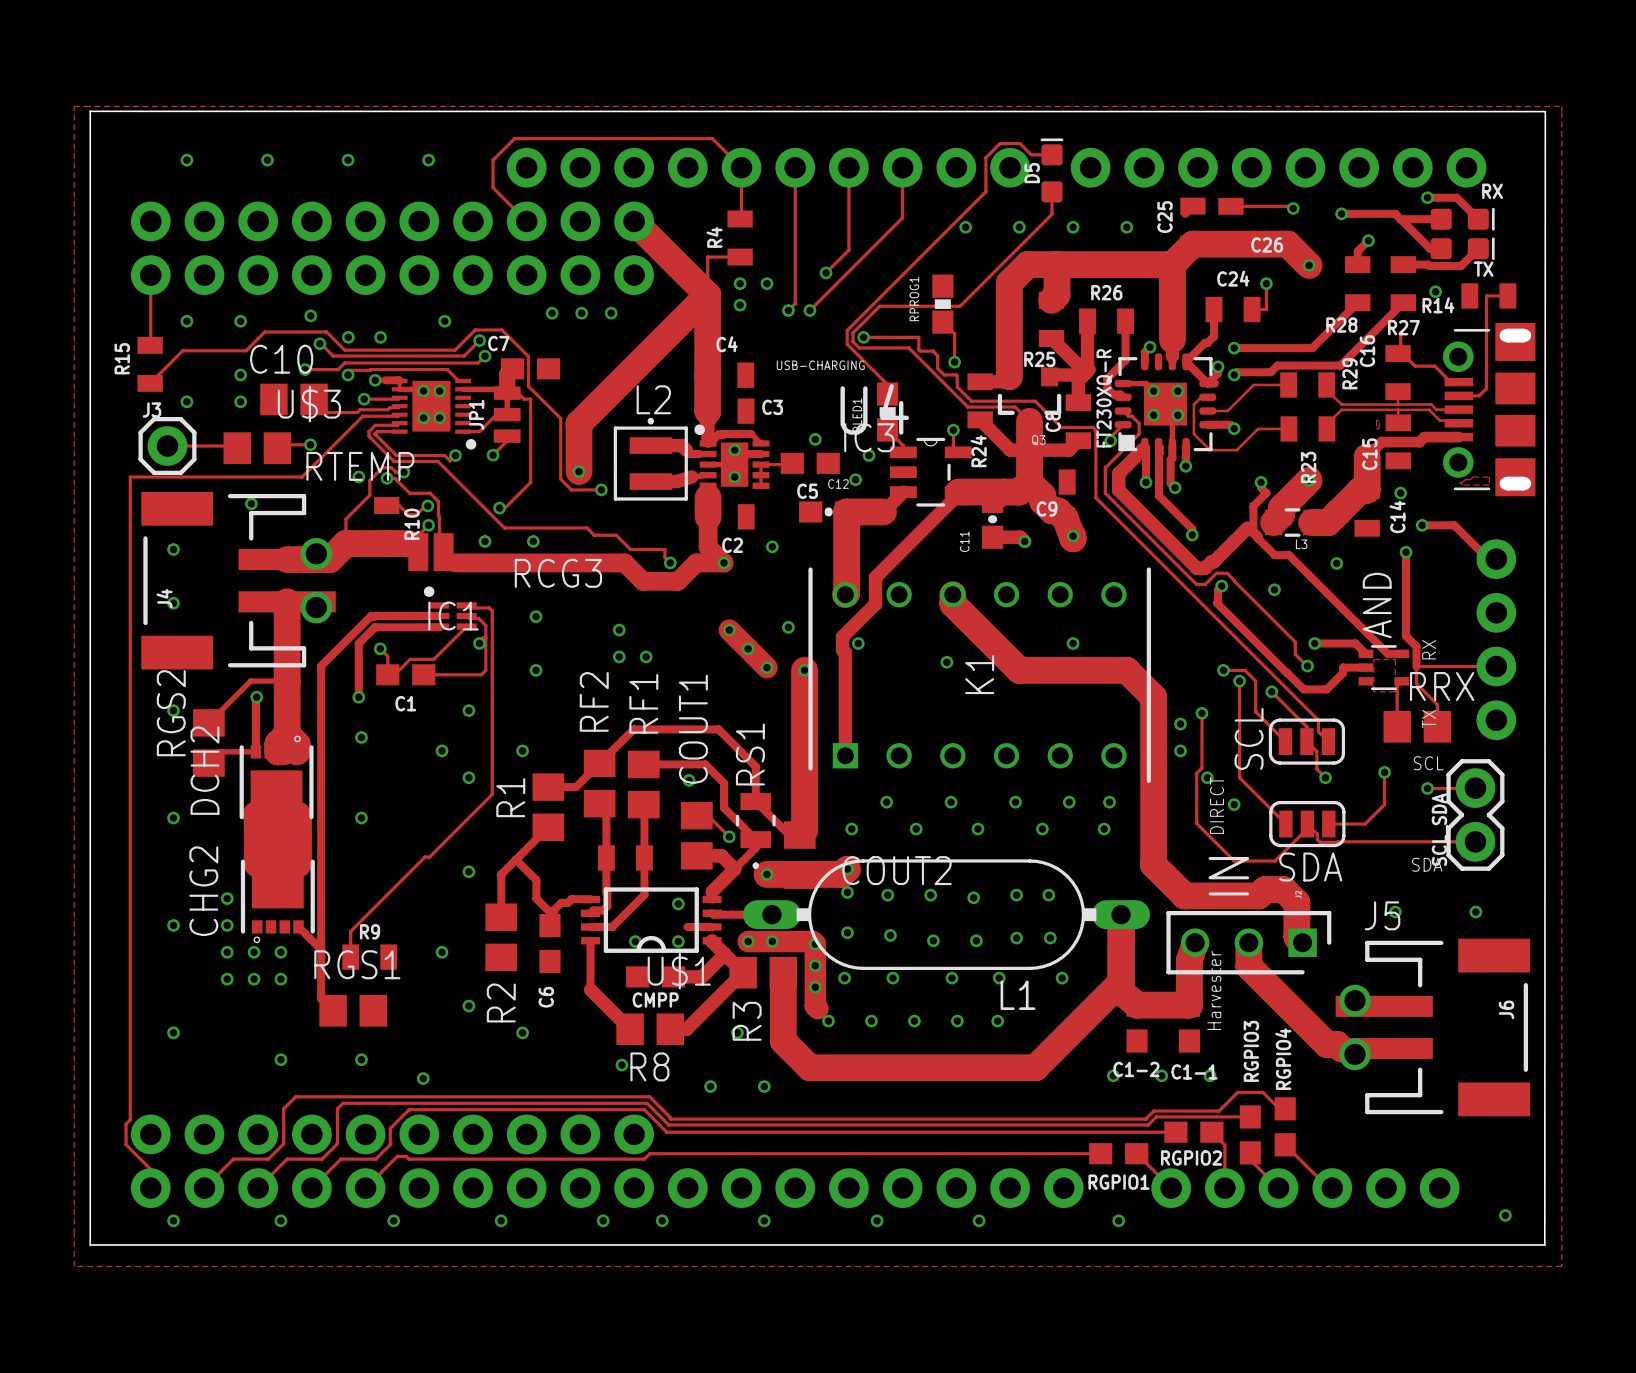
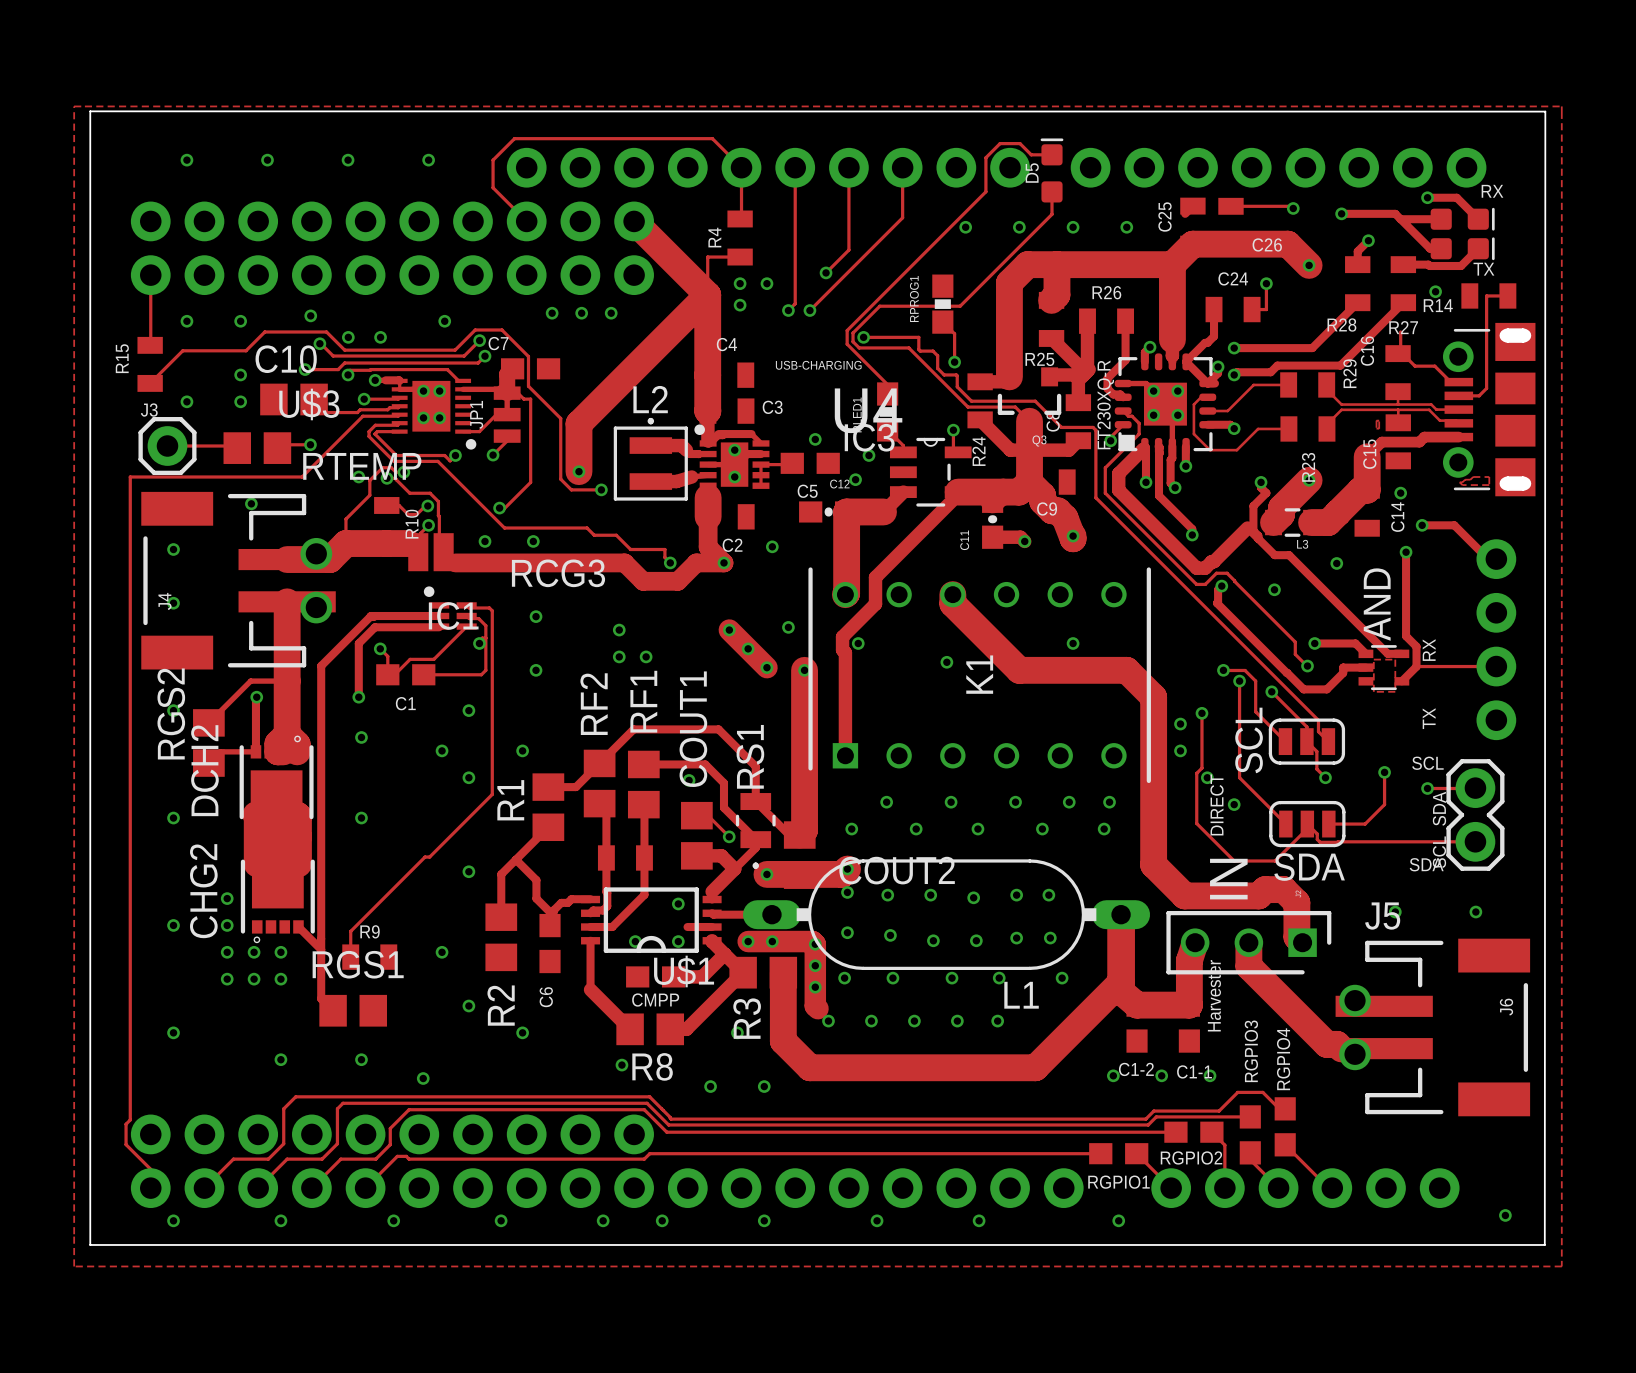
track: (1416, 666) (1416, 683) (1437, 704) (1437, 726) -> (1416, 666) (1401, 681)
track: (1401, 681) (1397, 685) (1397, 726) -> none
RRX: (1417, 726) -> none

